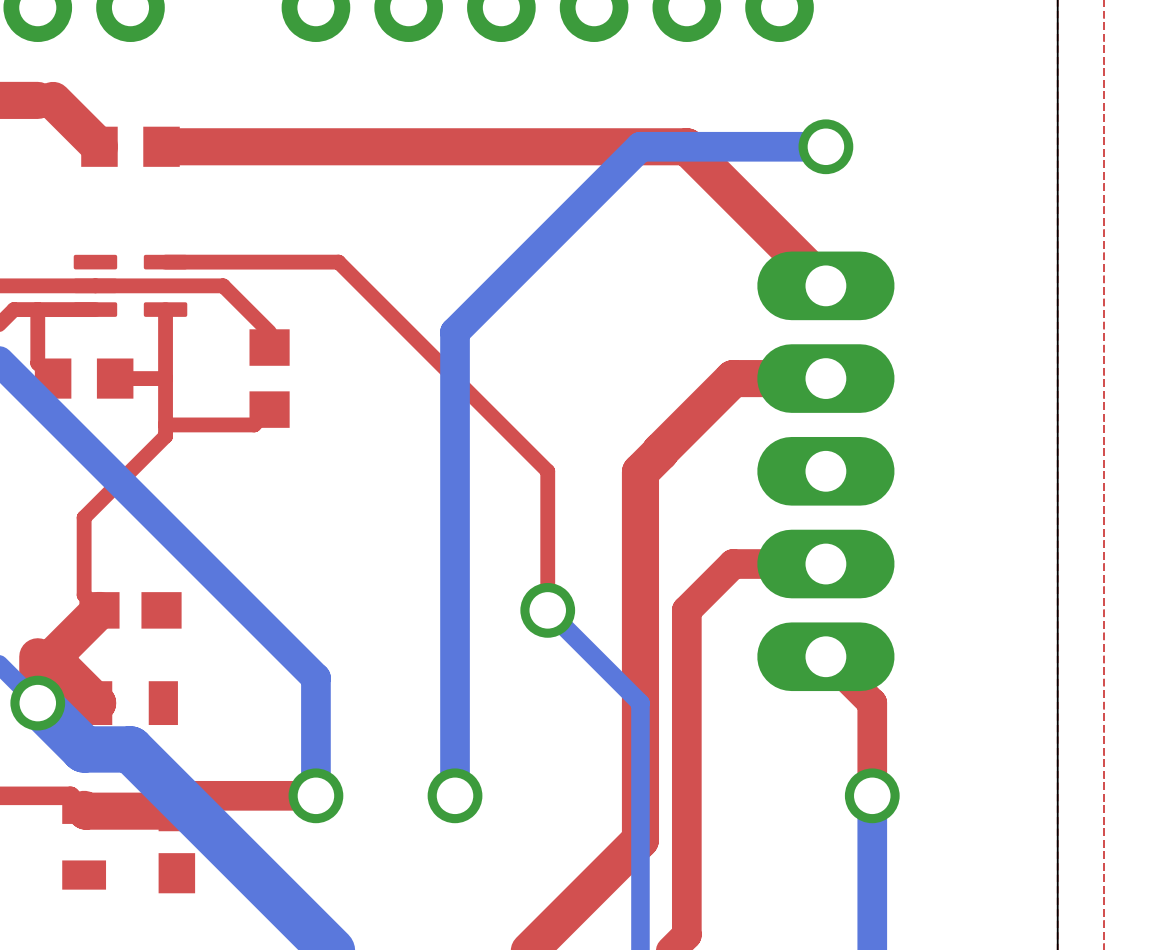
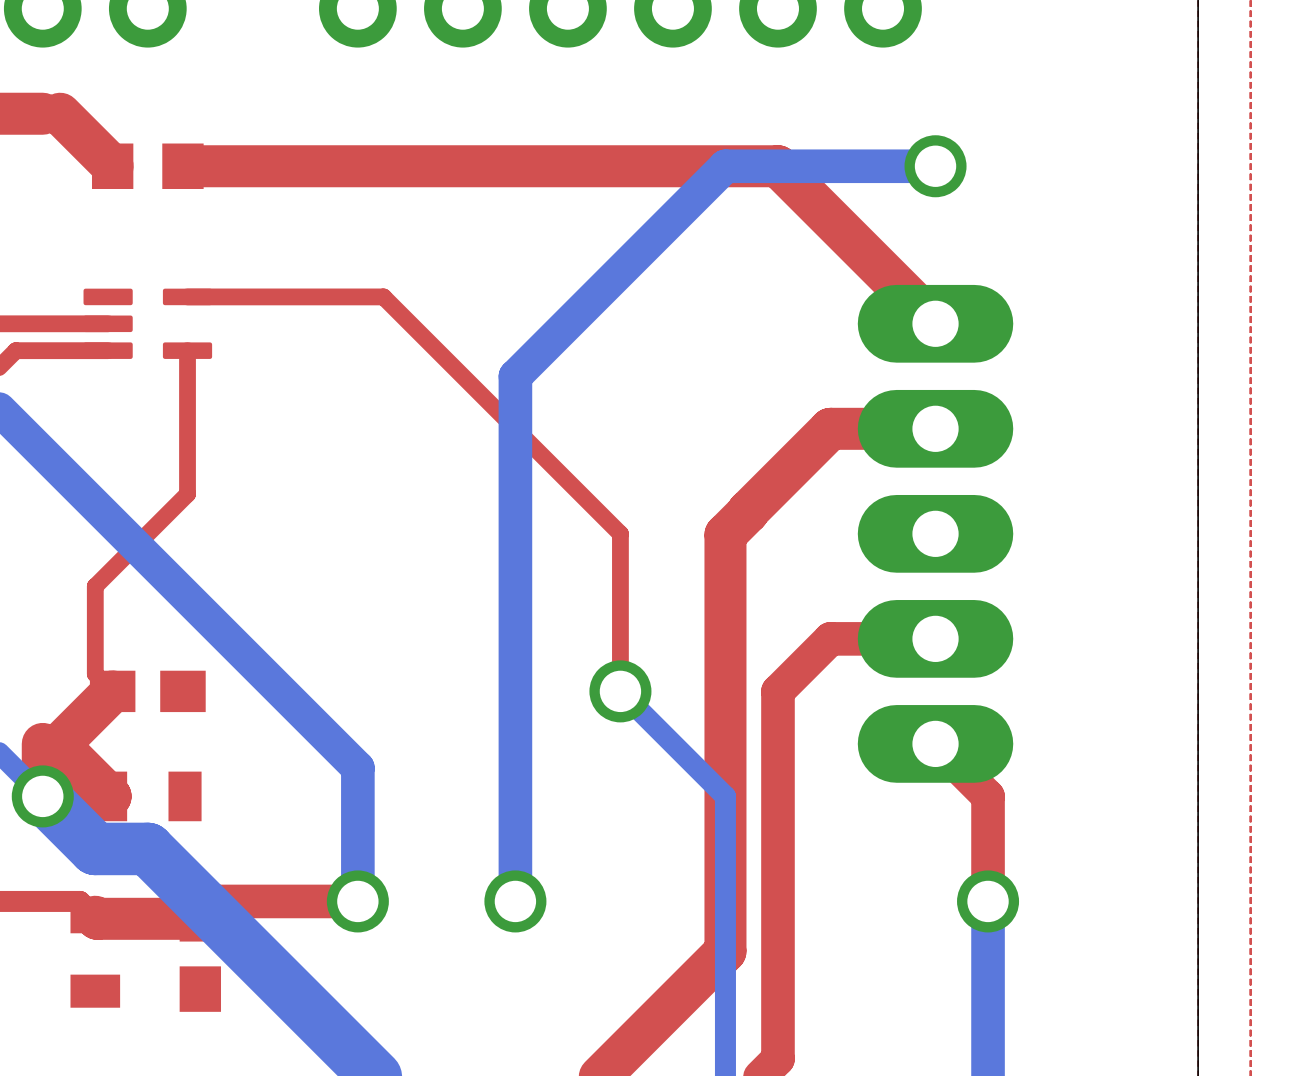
top track: (95, 285) (223, 285) (269, 332) -> none
top track: (37, 309) (37, 363) (53, 378) -> none
part: (84, 378) -> none
top track: (165, 378) (115, 378) -> none
part: (269, 378) -> none
top track: (269, 409) (254, 424) (165, 424) -> none

